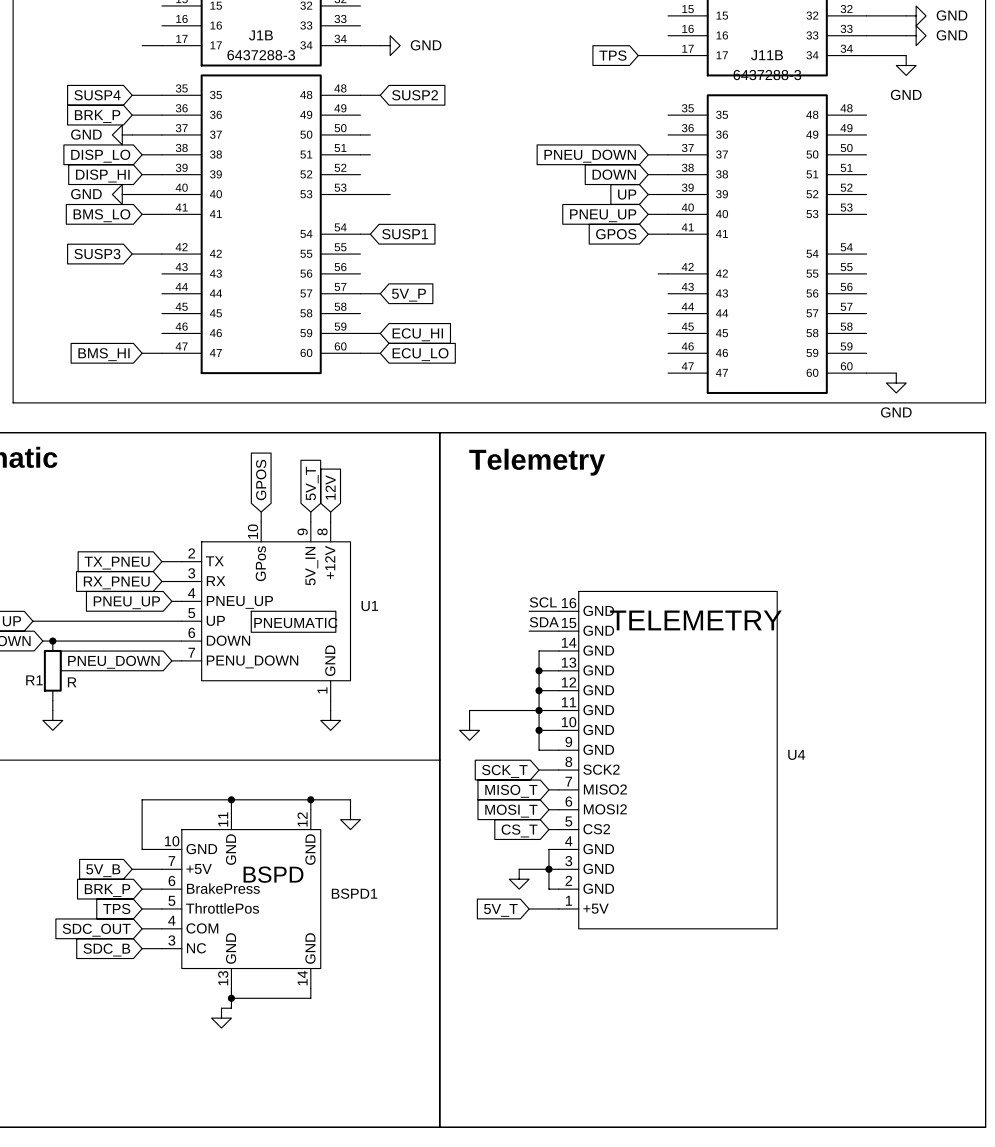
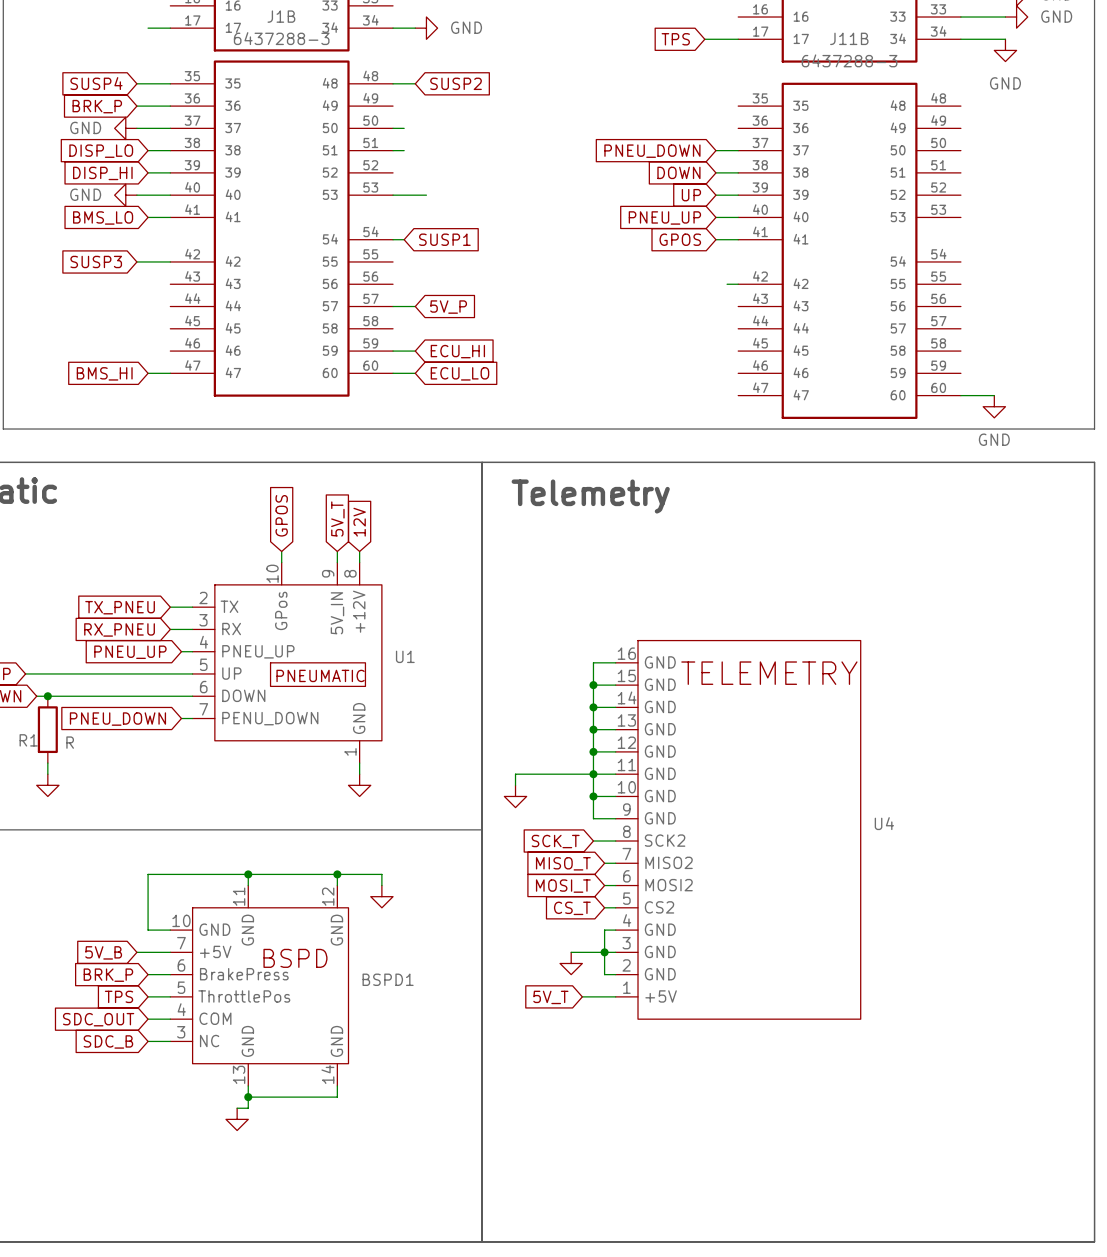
label: SCL (543, 602) -> none
wire: (529, 611) (539, 611) -> (593, 707) (593, 662)
label: SDA (544, 622) -> none
wire: (529, 631) (539, 631) -> none
junction: none -> (593, 685)
junction: none -> (593, 707)

